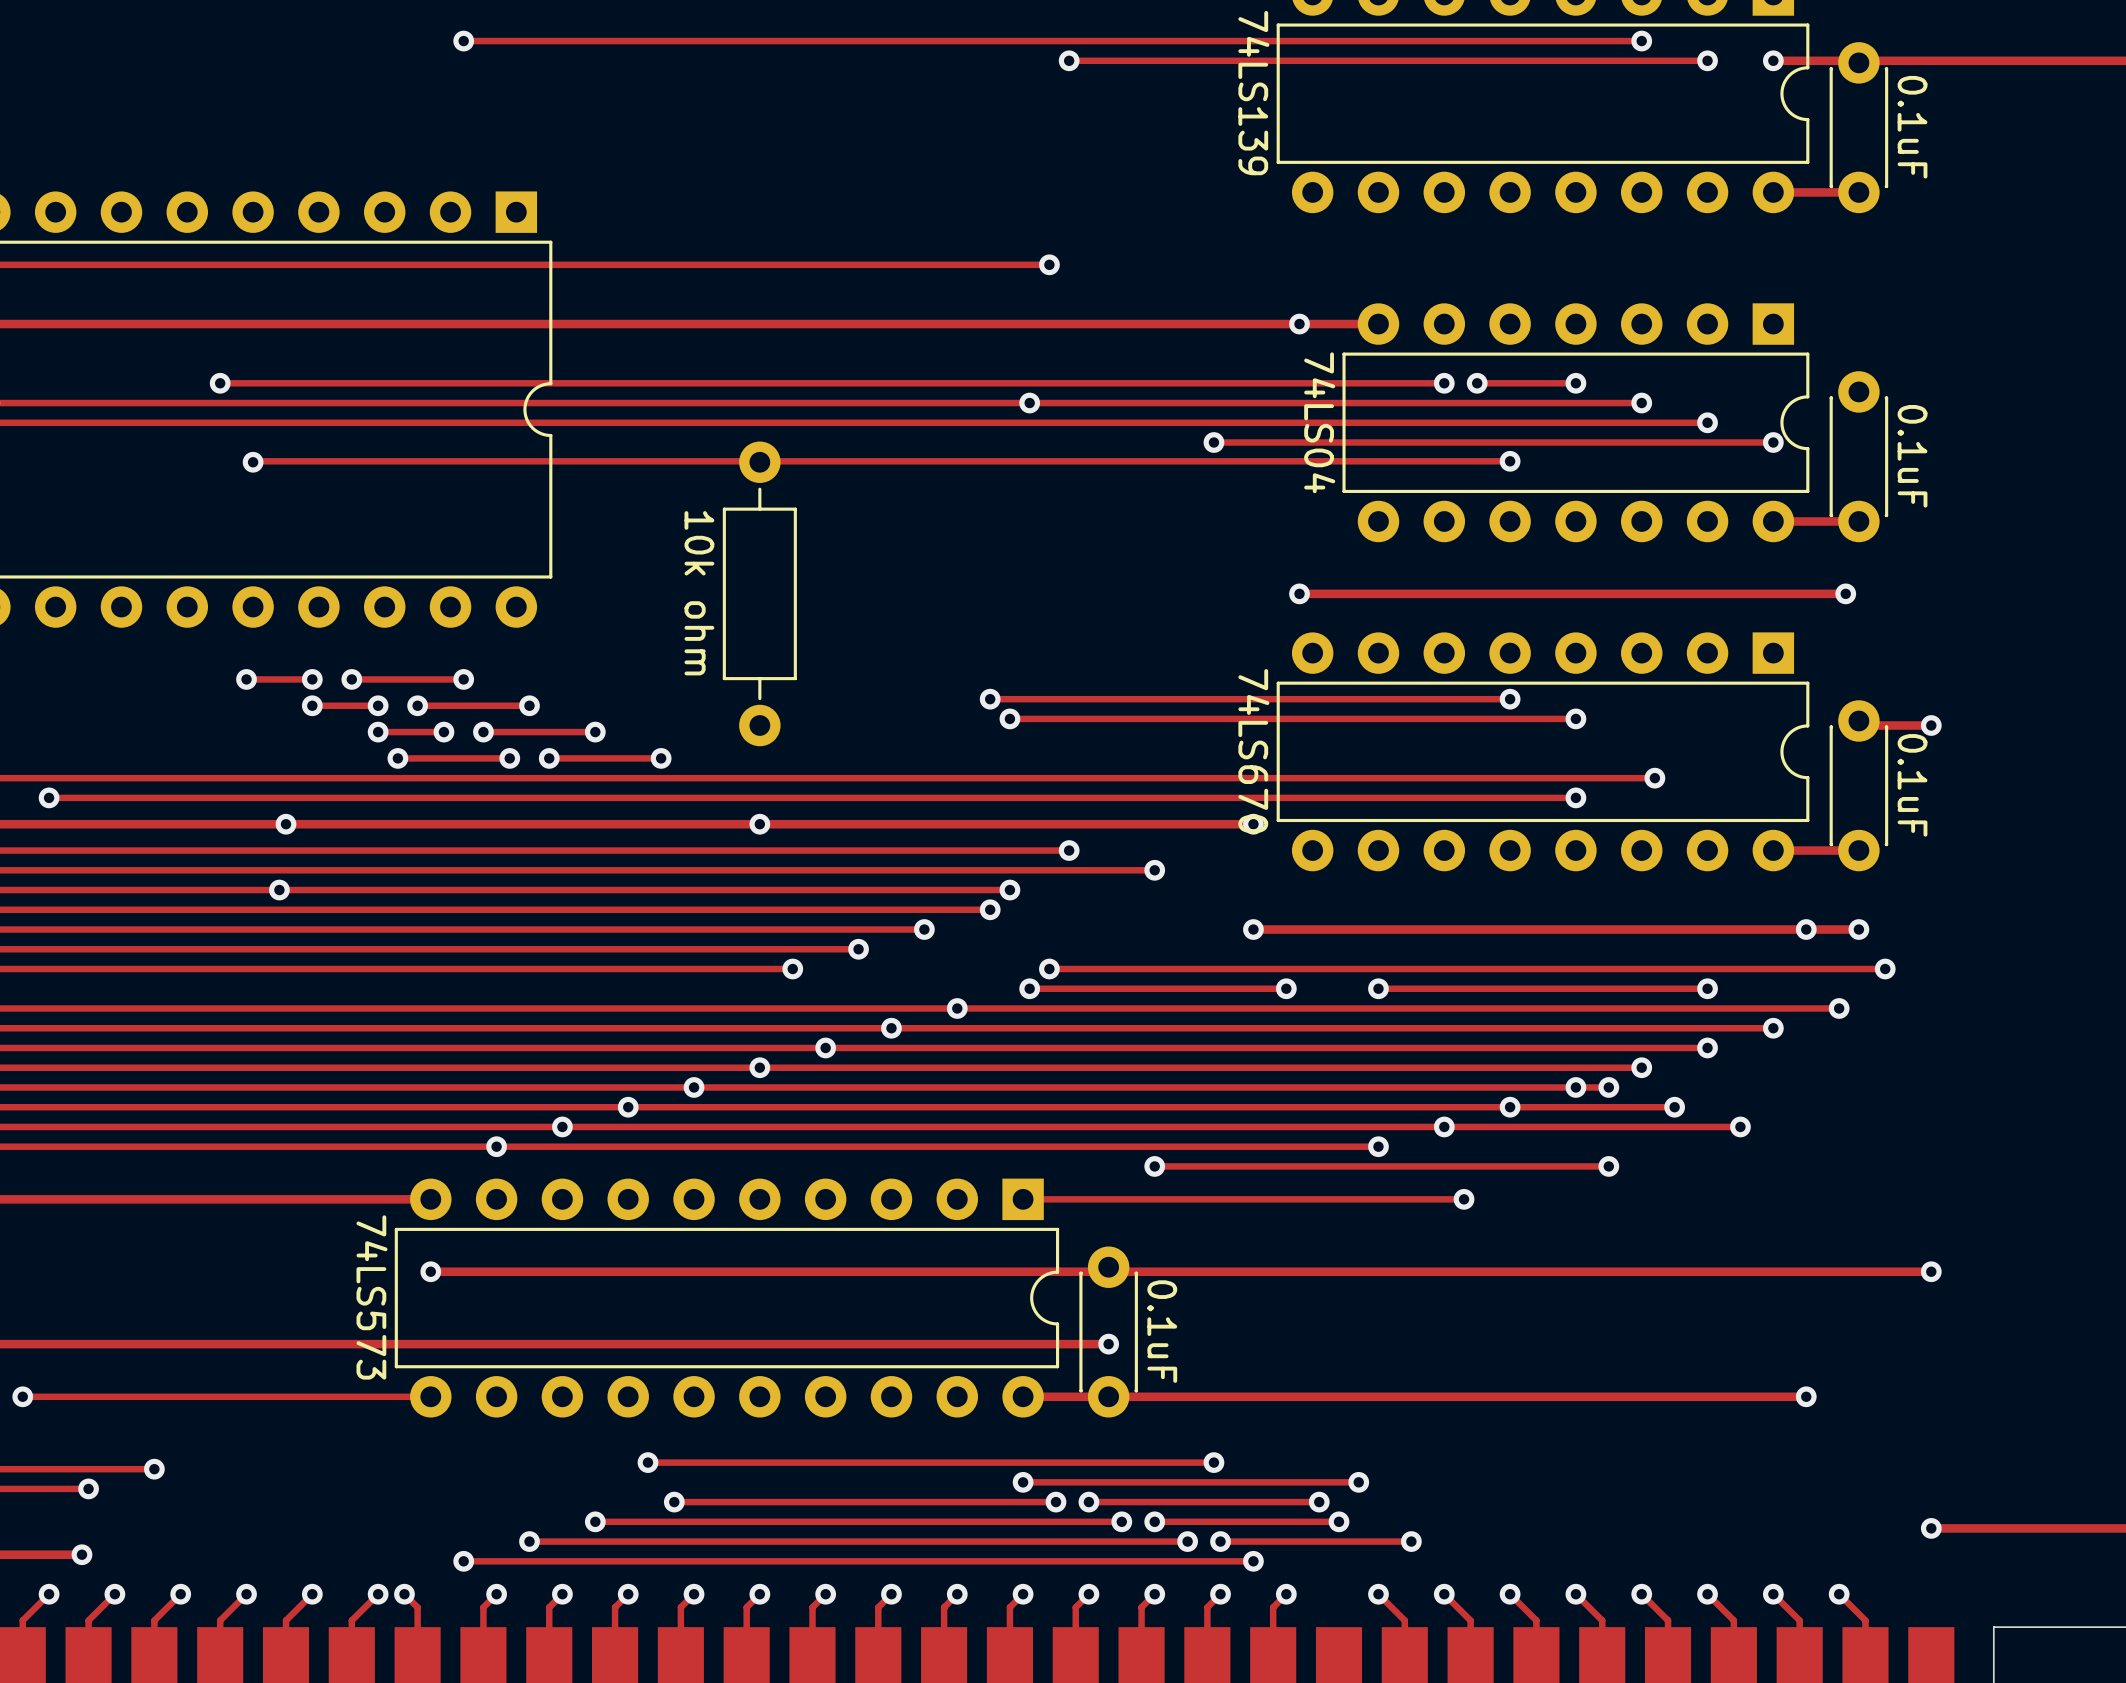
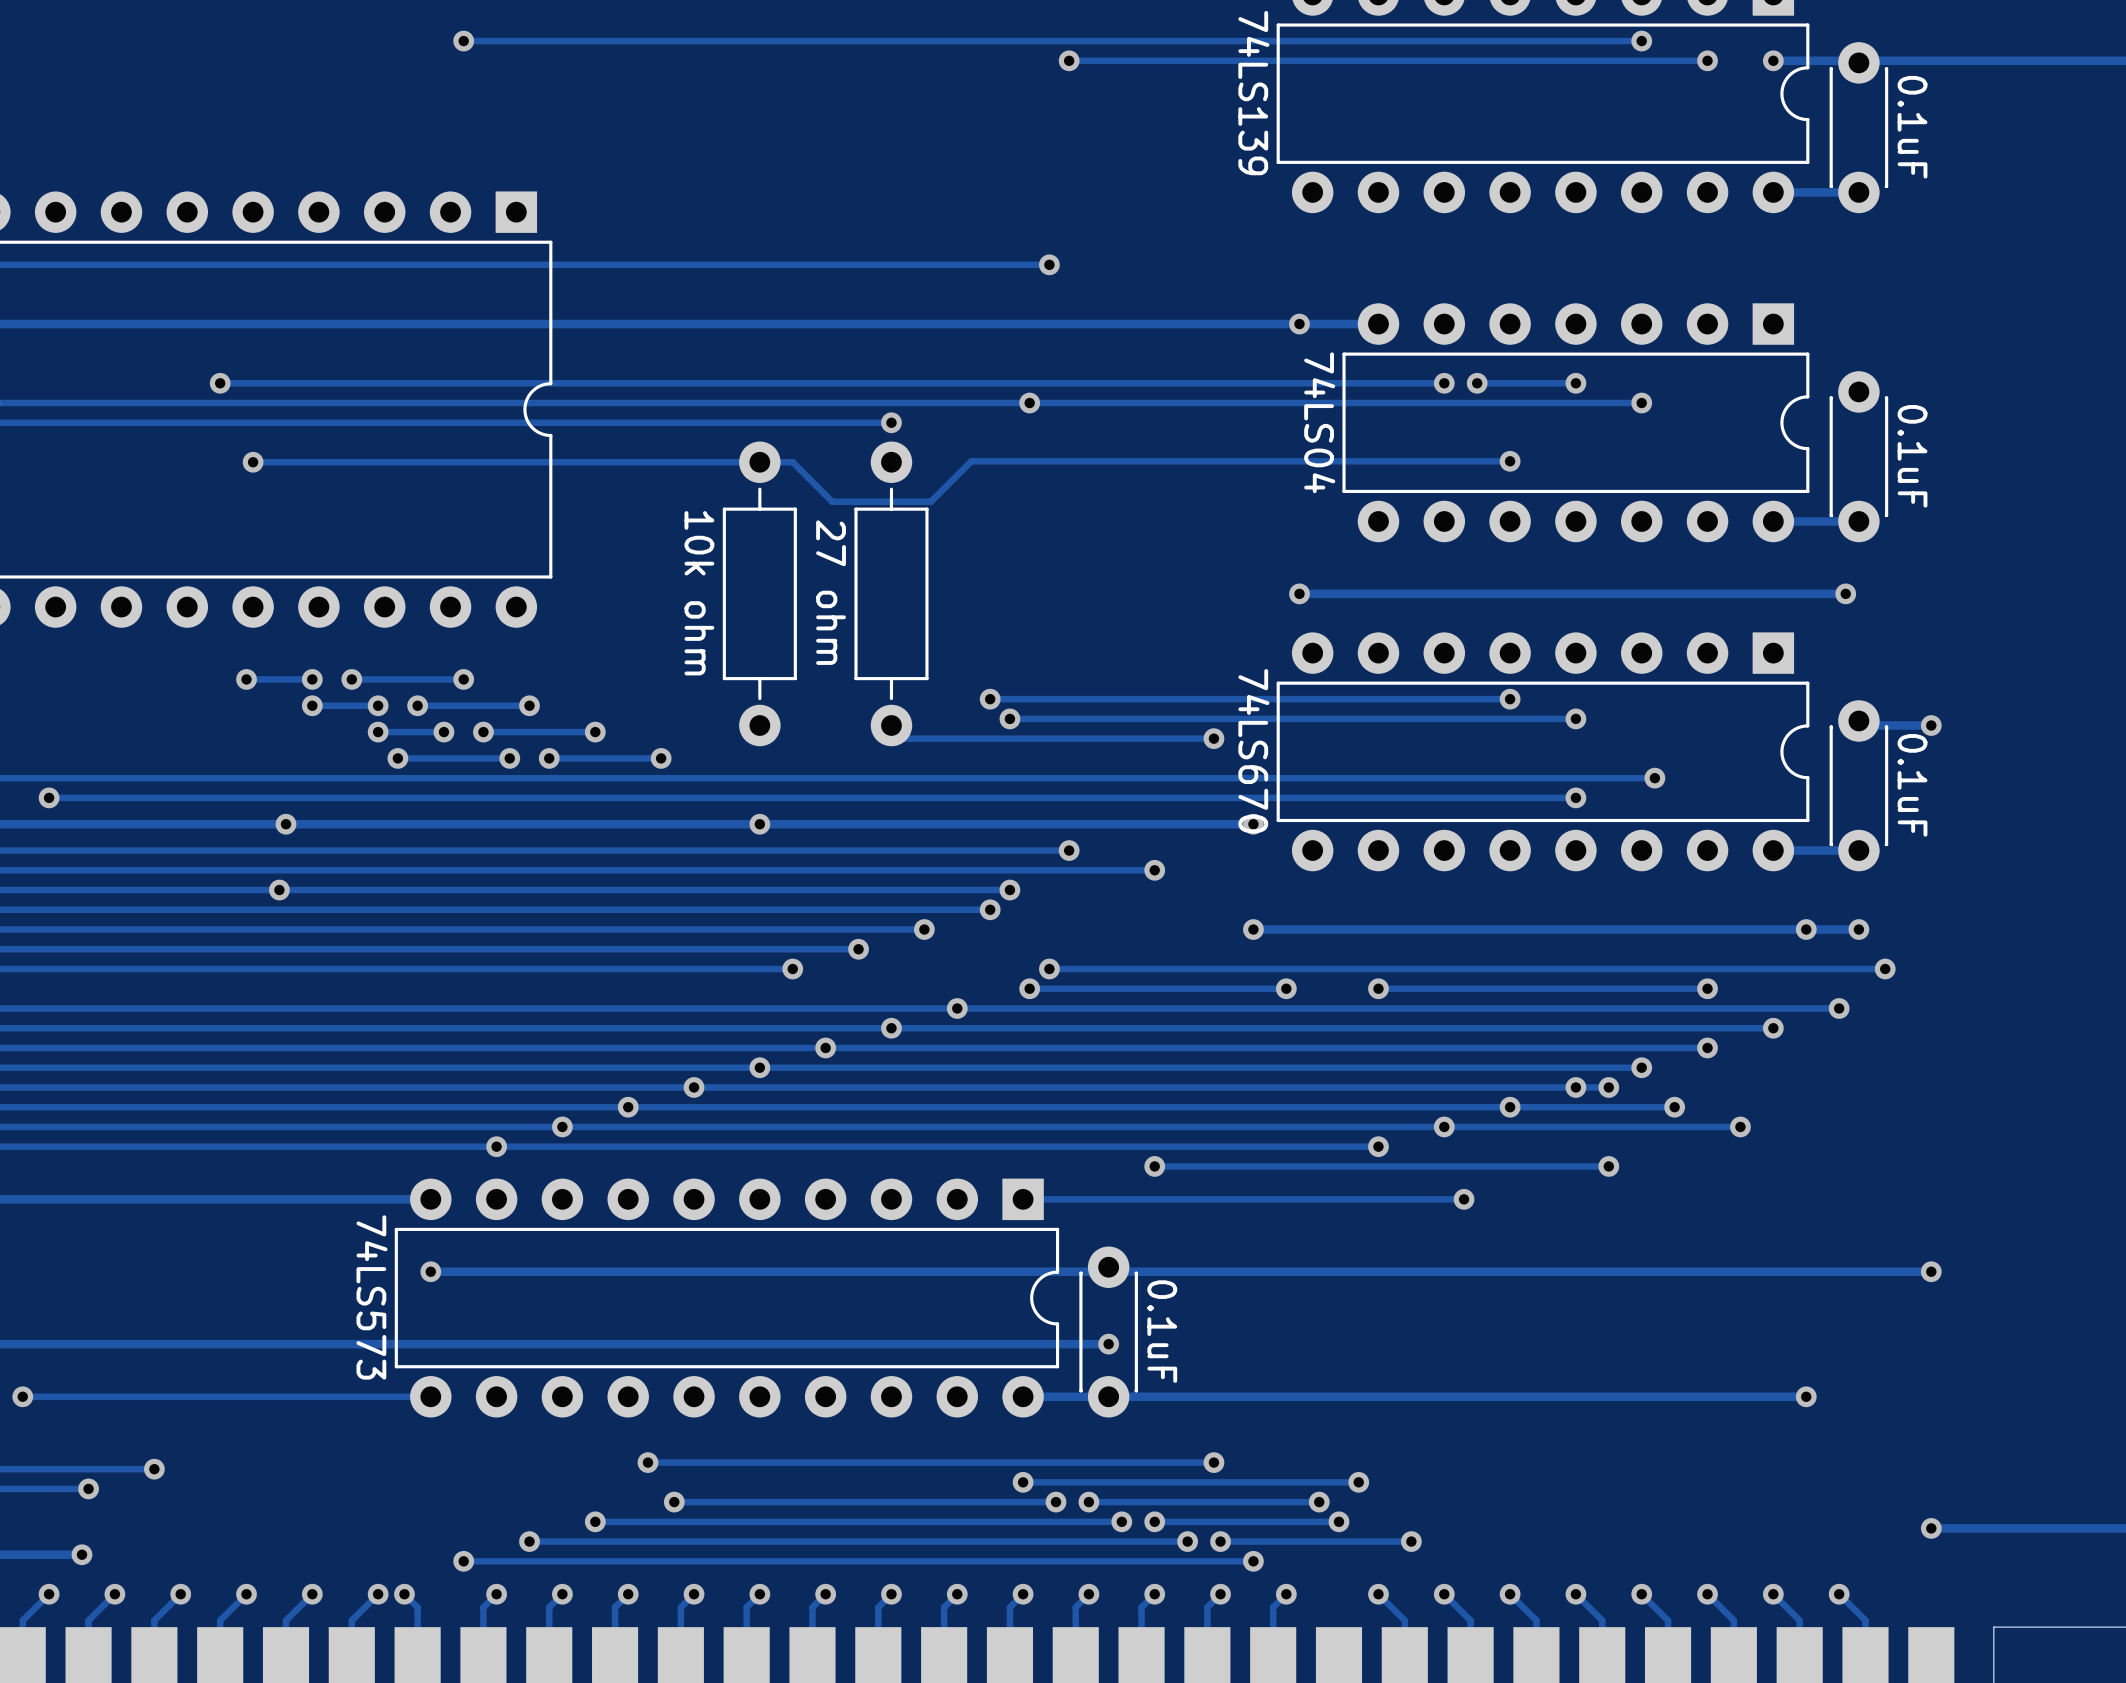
track: (891, 422) (1707, 422) -> none
via: none -> (891, 422)
via: (1707, 422) -> none
track: (1213, 442) (1773, 442) -> none
via: (1213, 442) -> none
via: (1773, 442) -> none
track: (254, 461) (971, 461) -> (253, 462) (792, 462) (832, 501) (930, 501) (971, 461)
part: none -> 27 ohm (891, 593)
track: none -> (891, 725) (904, 738) (1213, 738)
via: none -> (1213, 738)

